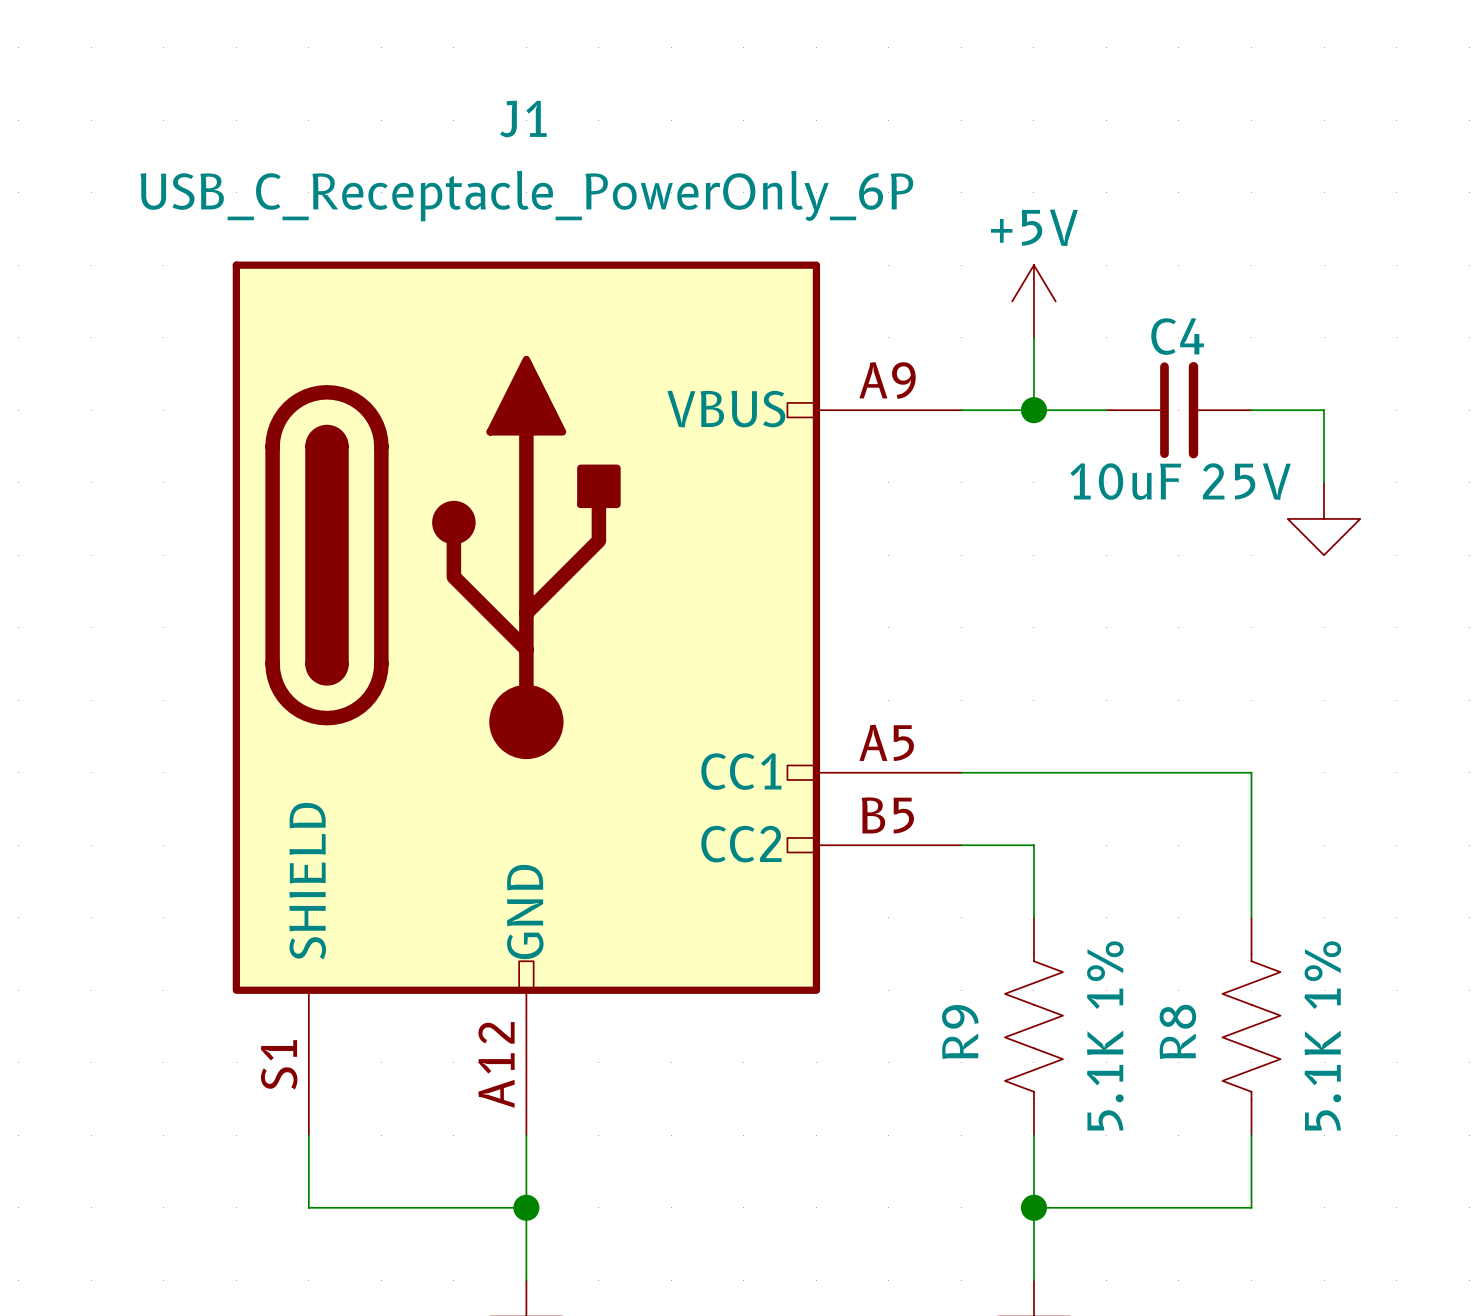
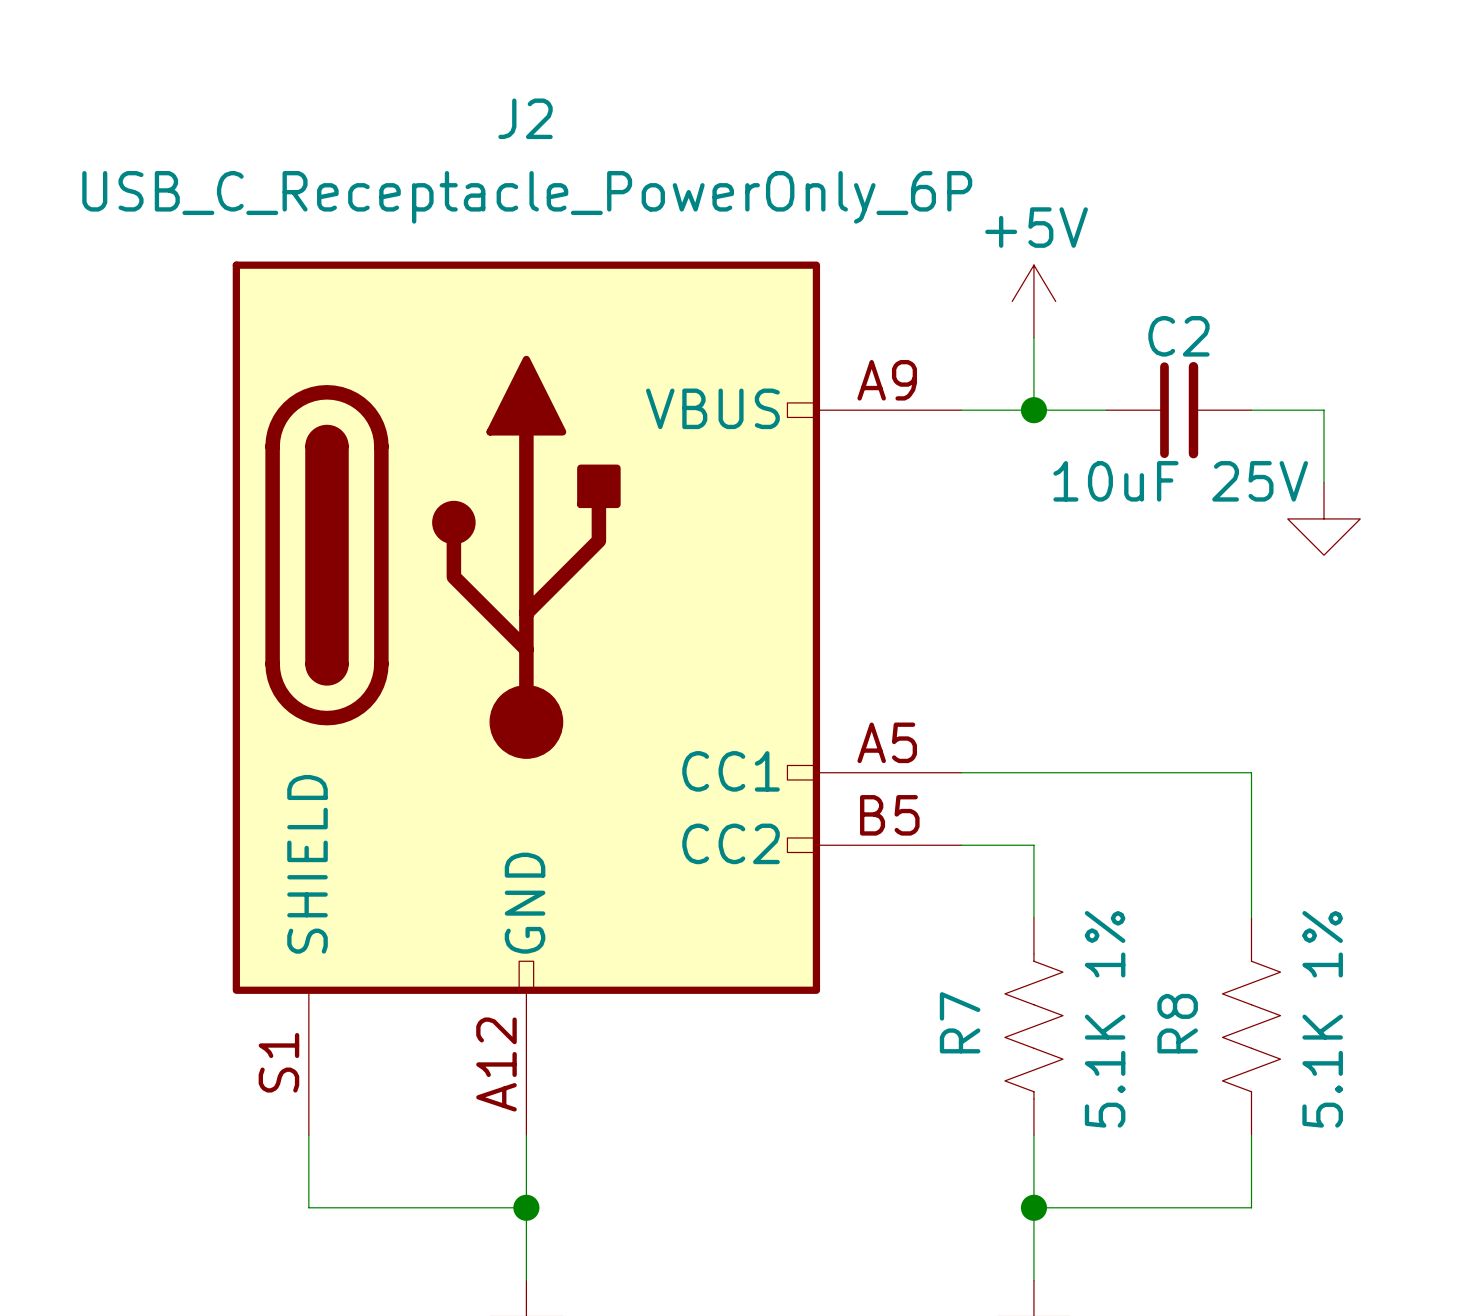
J1 name: J1 (523, 118) -> J2 (525, 118)
C4 name: C4 (1177, 336) -> C2 (1178, 336)
R9 name: R9 (960, 1032) -> R7 (960, 1022)

